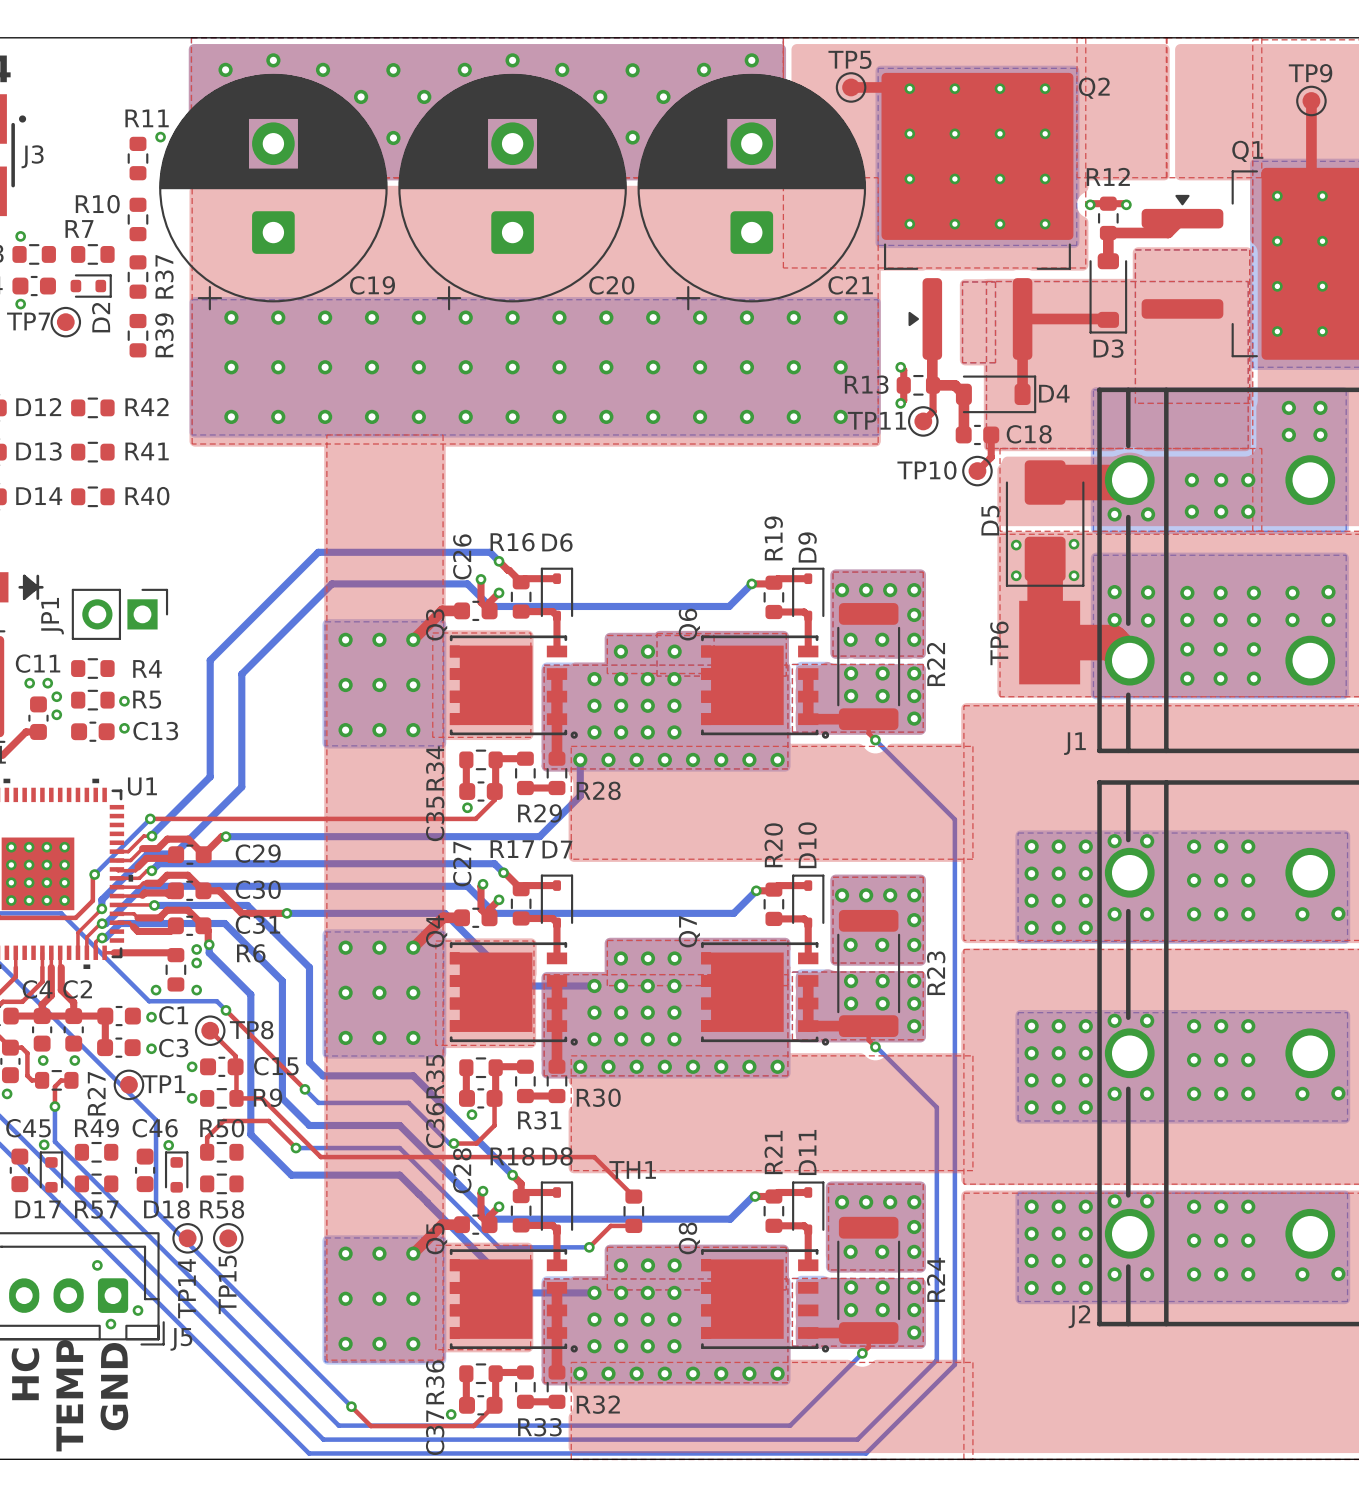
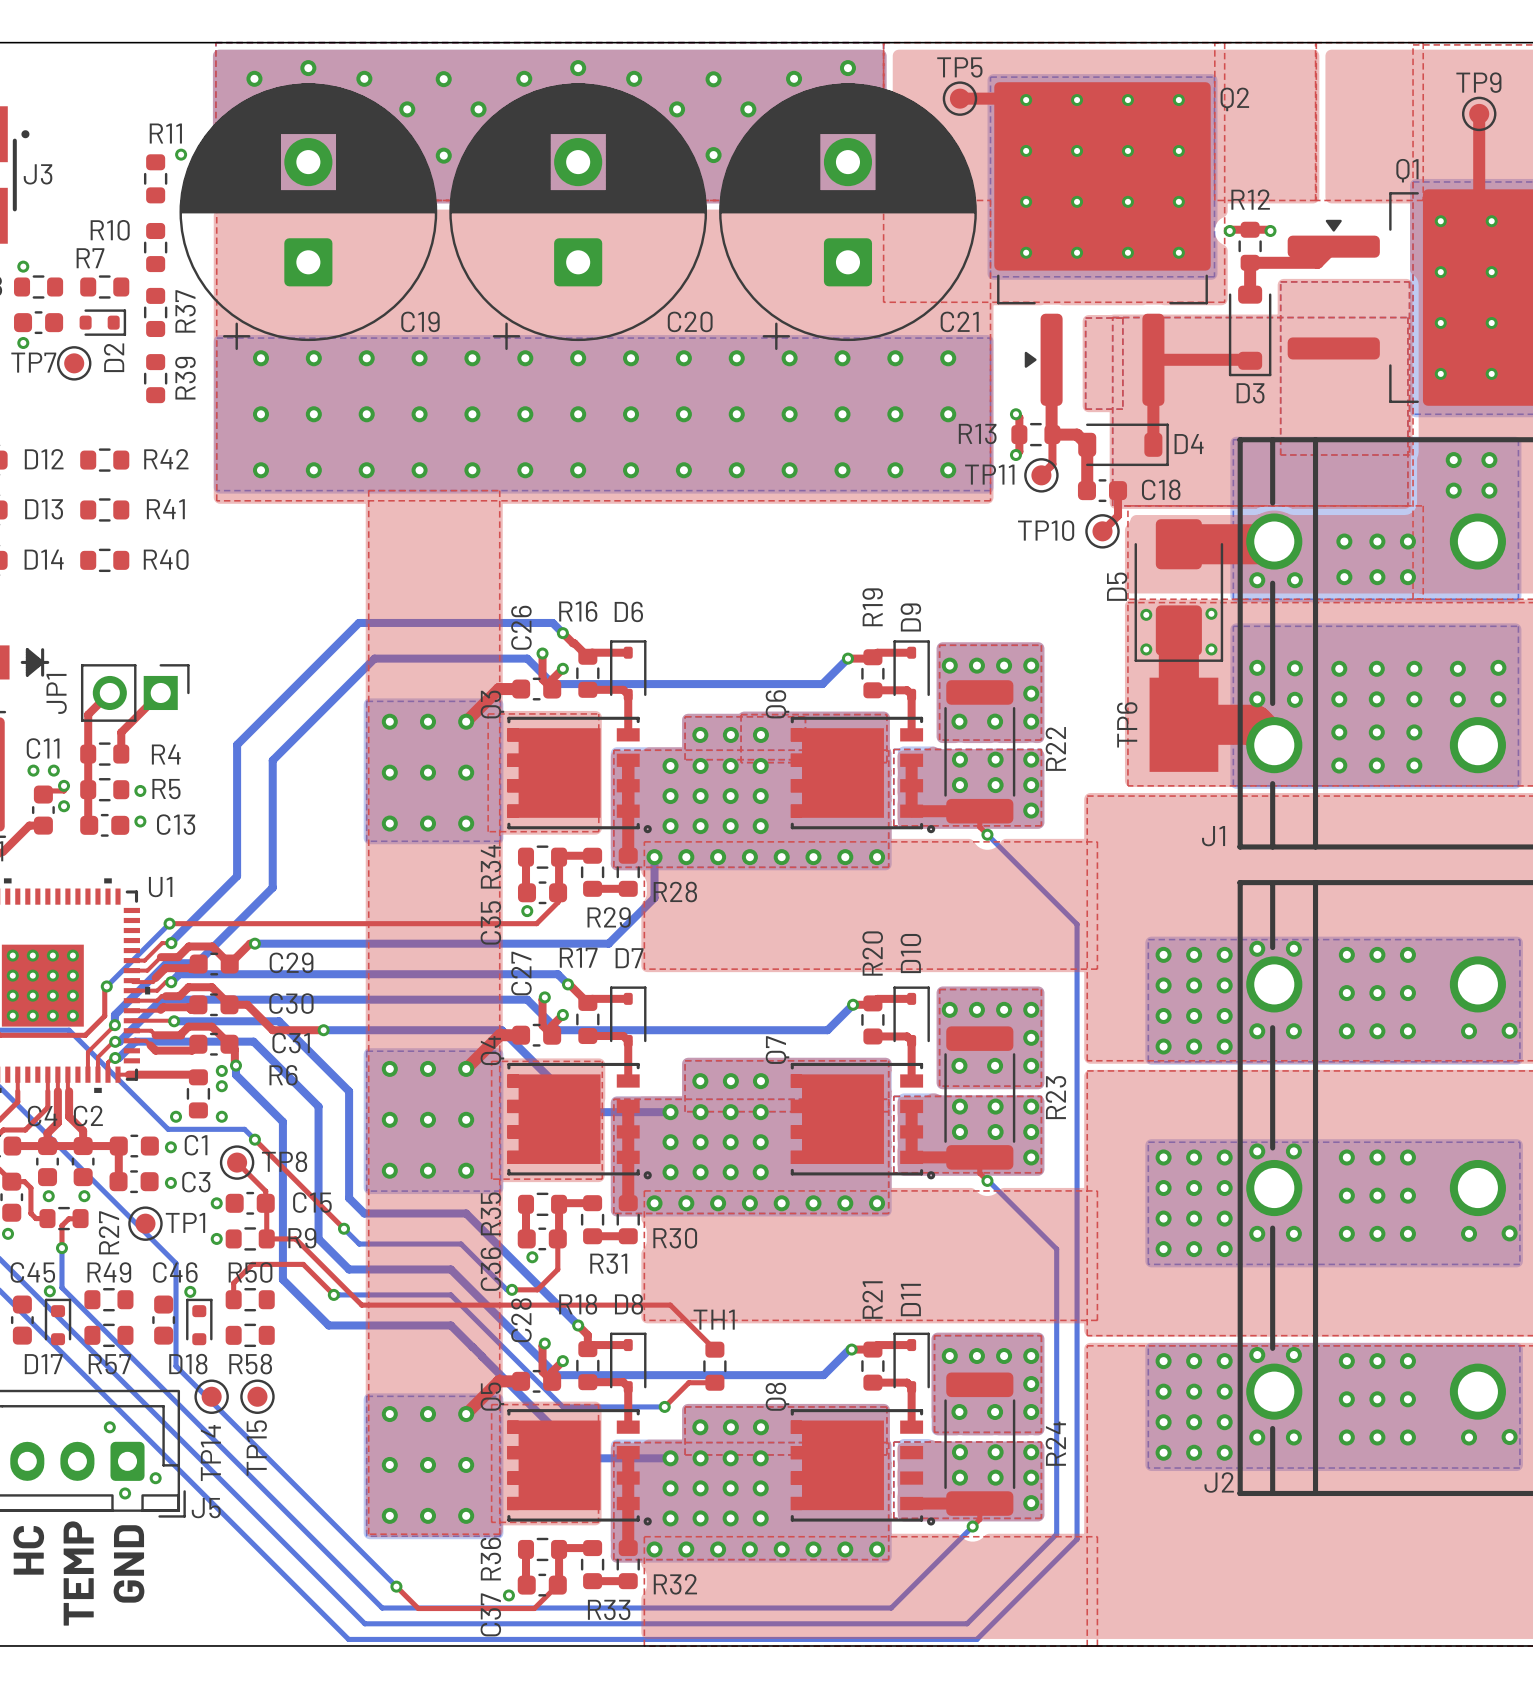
top track: none -> (109, 692) (88, 714) (89, 825)
top track: none -> (160, 692) (121, 732) (121, 754)
top track: none -> (65, 789) (46, 790)

